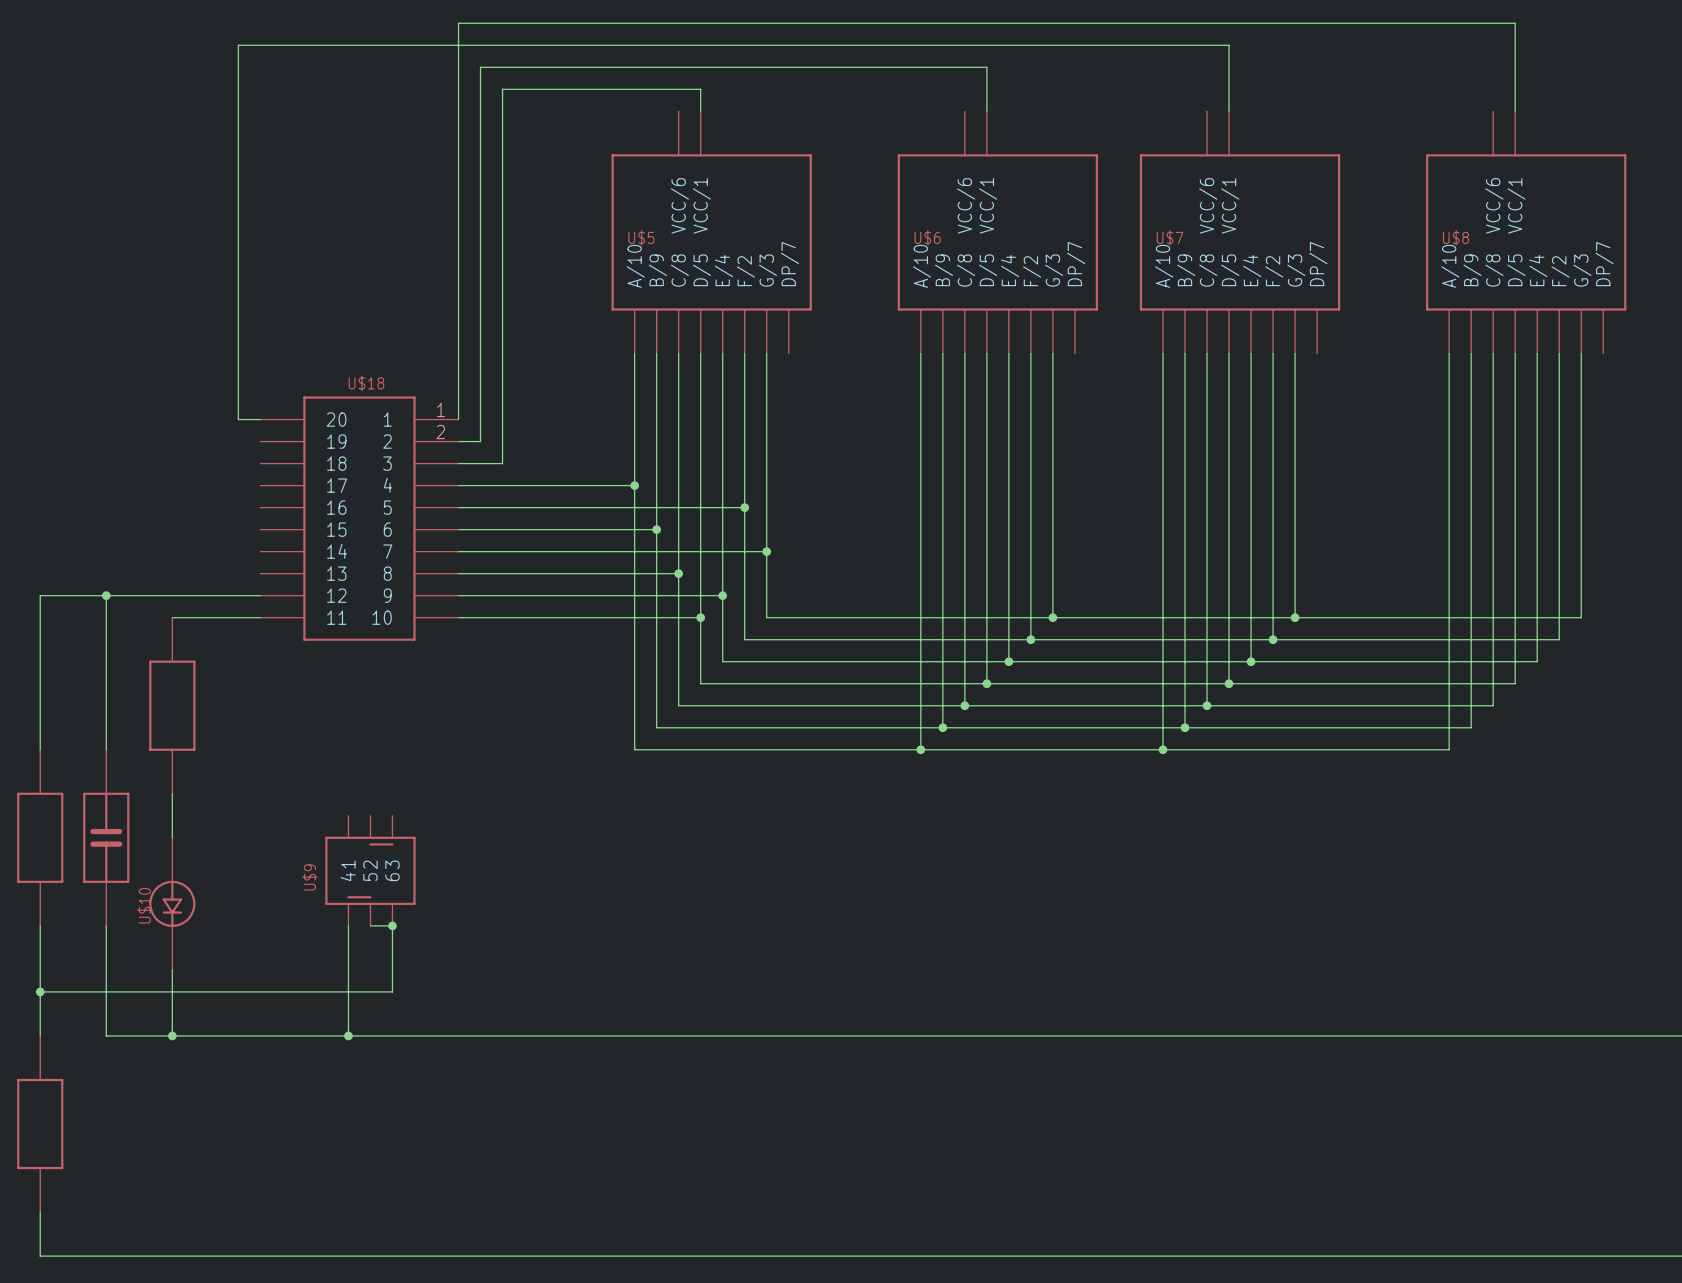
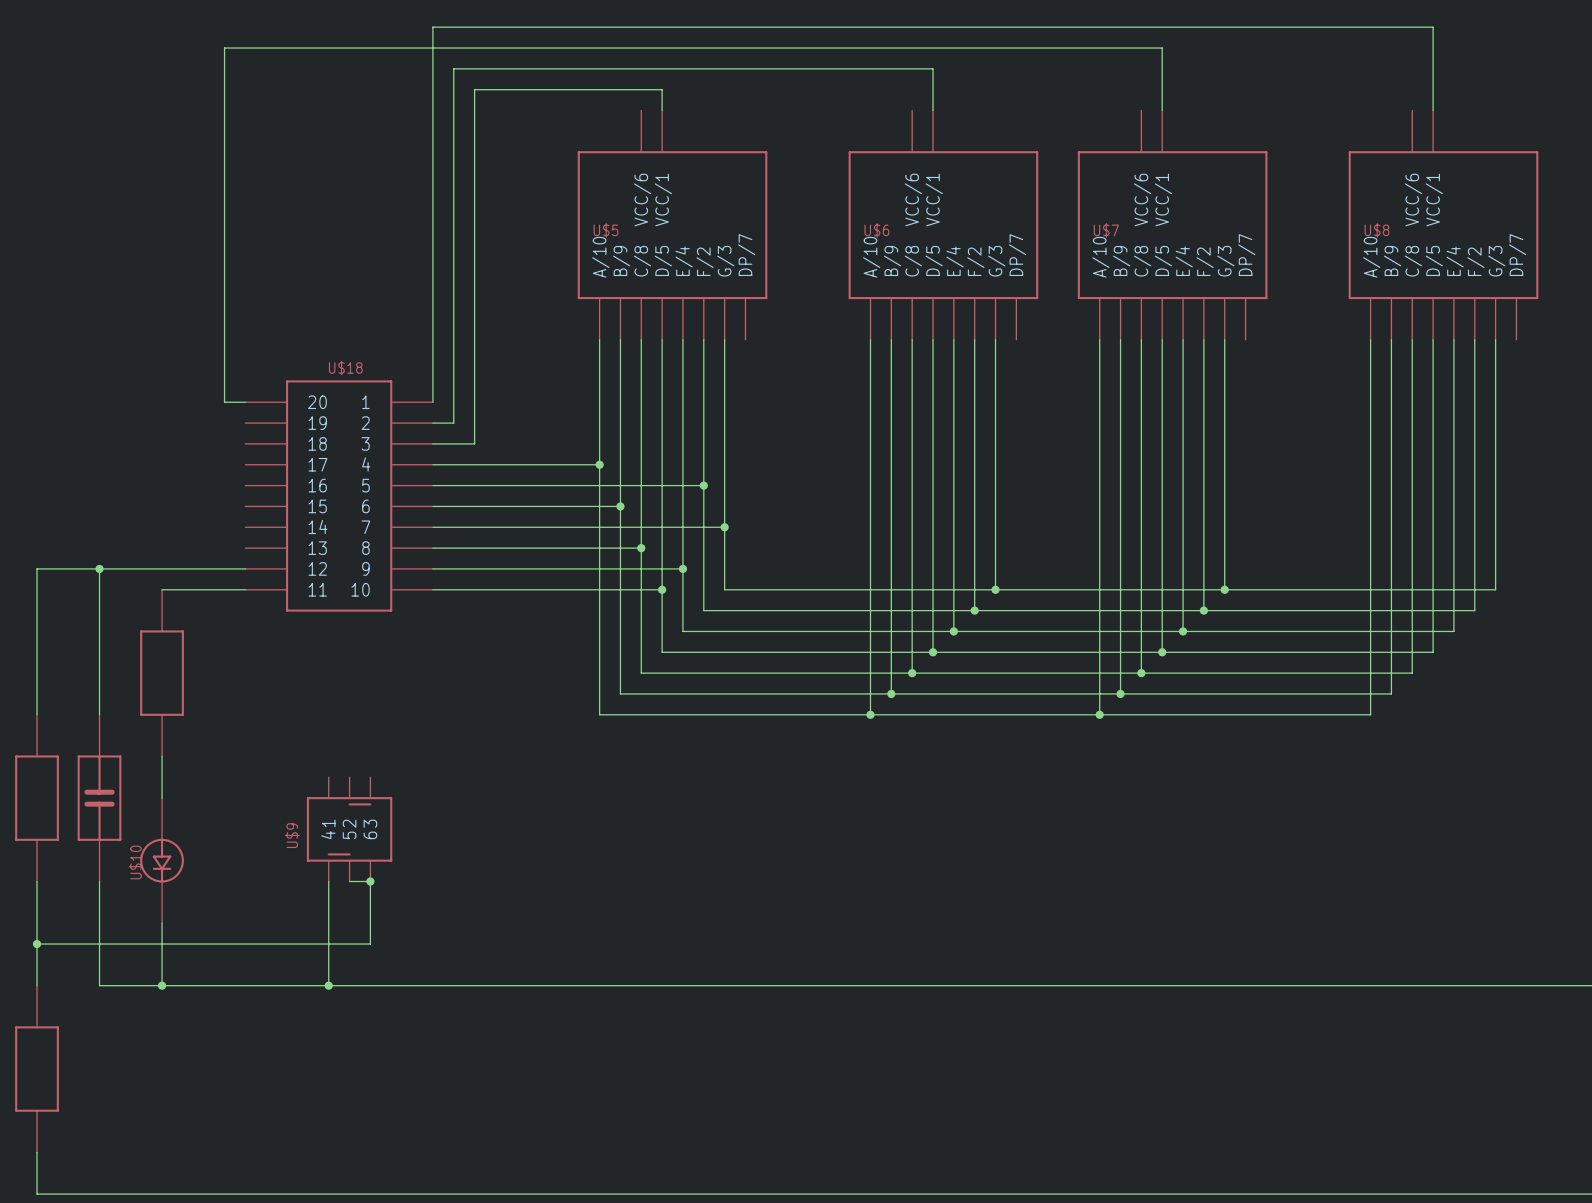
U$18 pin number: 1 (441, 410) -> none
U$18 pin number: 2 (440, 432) -> none

